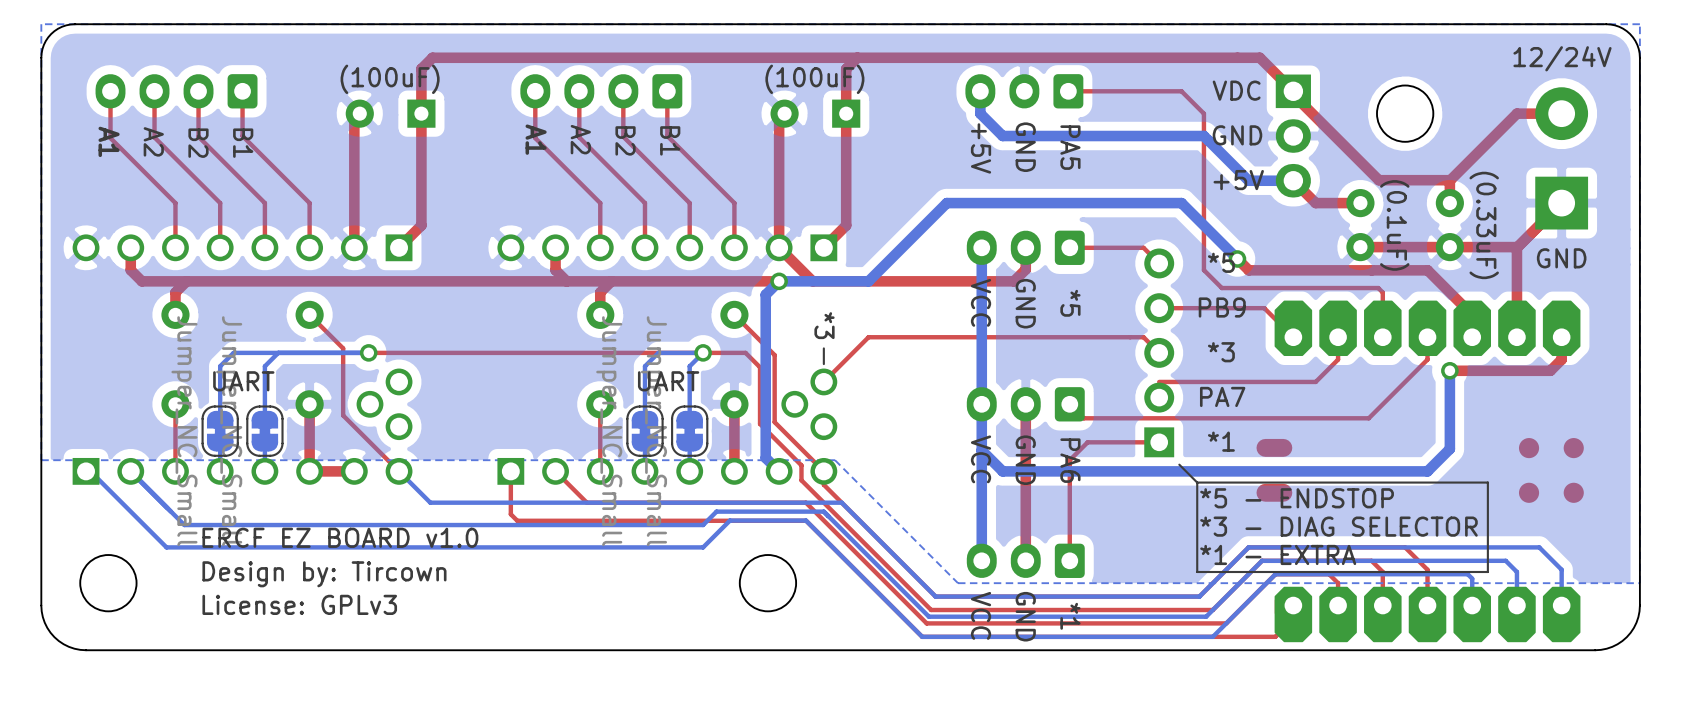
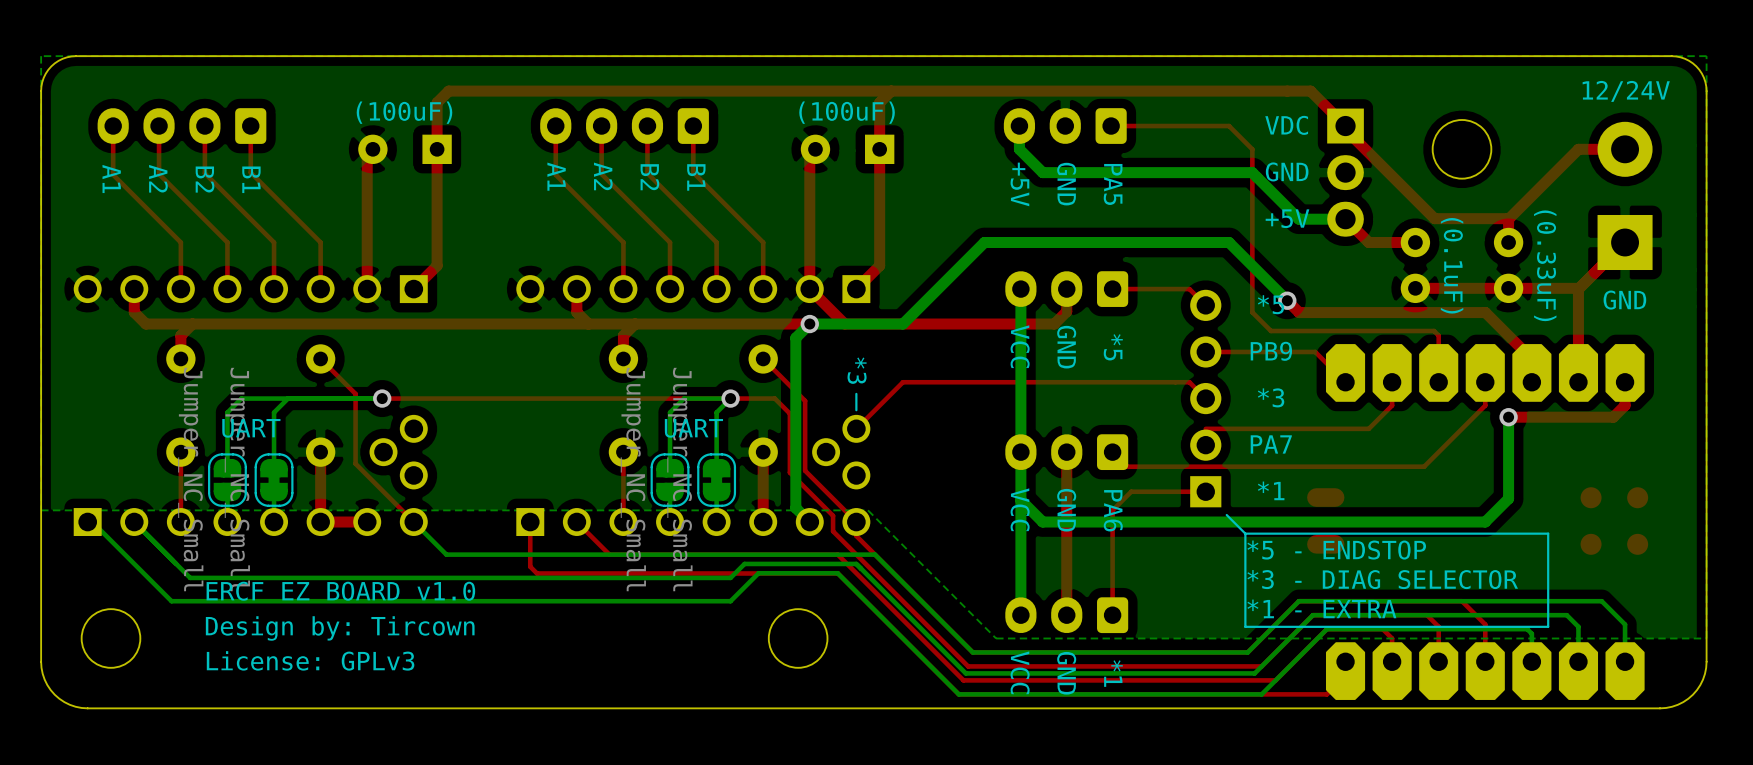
part footprint: [201, 405, 239, 457] -> [208, 453, 247, 507]
part footprint: [626, 405, 664, 457] -> [650, 453, 690, 507]

